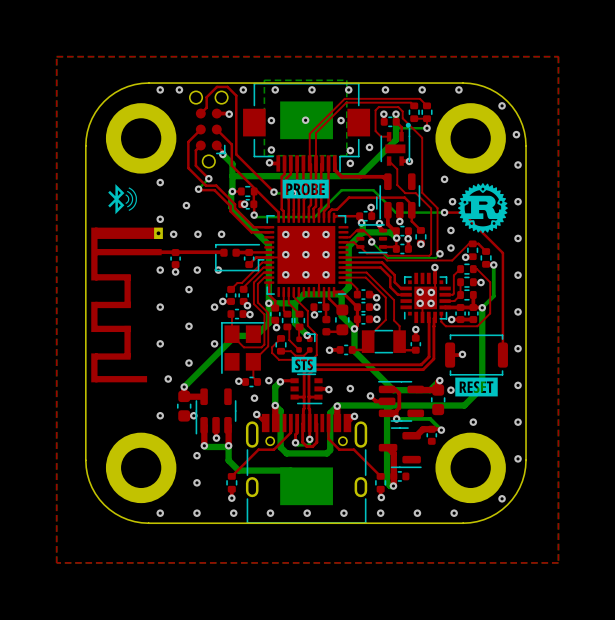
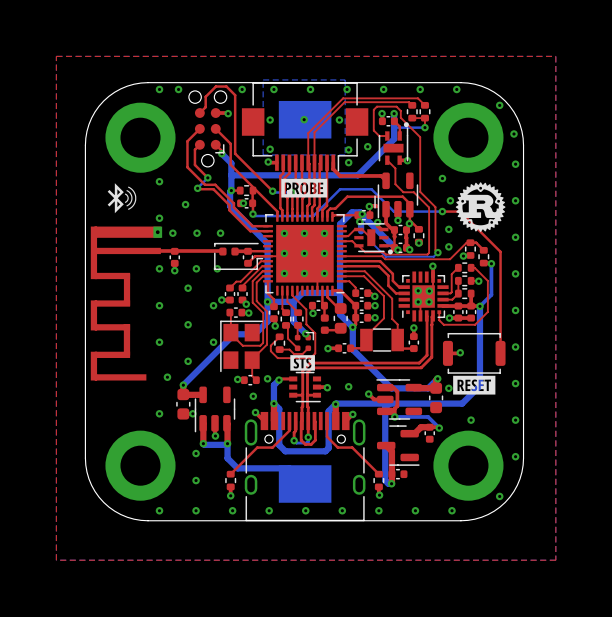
top track: none -> (369, 205) (376, 206)
via: none -> (362, 214)
part footprint: [356, 224, 388, 254] -> [354, 223, 393, 255]
via: none -> (409, 223)
bottom track: (396, 238) (390, 232) (362, 232) (348, 246) (348, 287) (341, 294) -> (397, 250) (360, 212) (352, 212) (340, 224) (340, 292)
via: (396, 238) -> none
via: (408, 238) -> none
via: (371, 241) -> none
via: none -> (409, 249)
via: none -> (397, 250)

